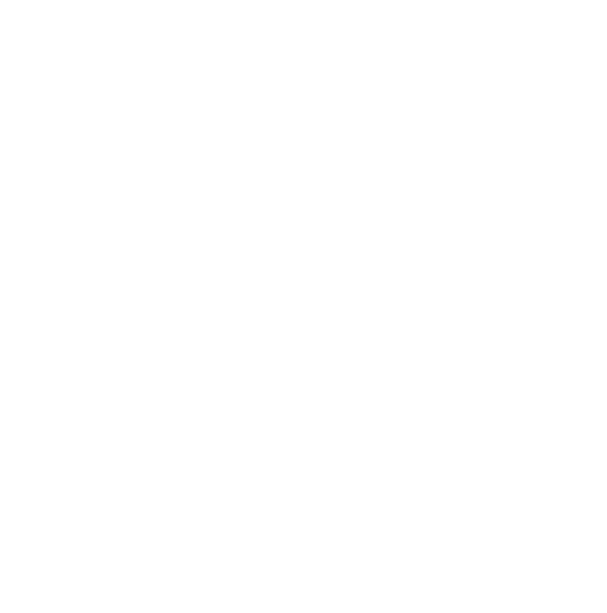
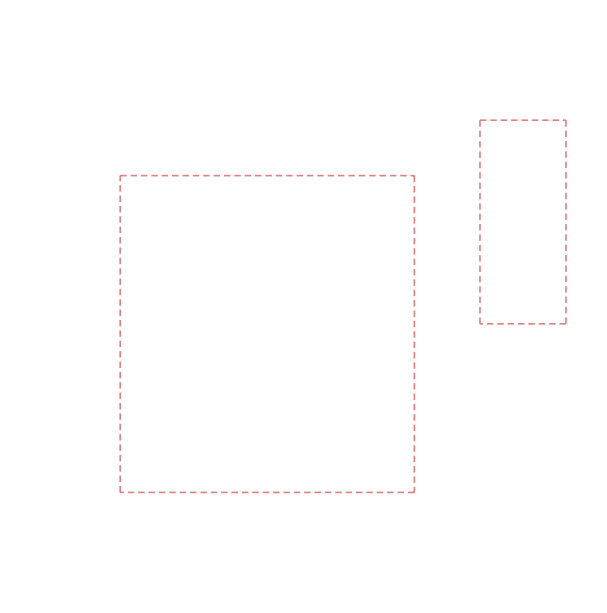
top zone outline: none -> (479, 120) (565, 120) (565, 323) (479, 323) (479, 120)
top zone outline: none -> (120, 175) (414, 175) (414, 492) (120, 492) (120, 175)

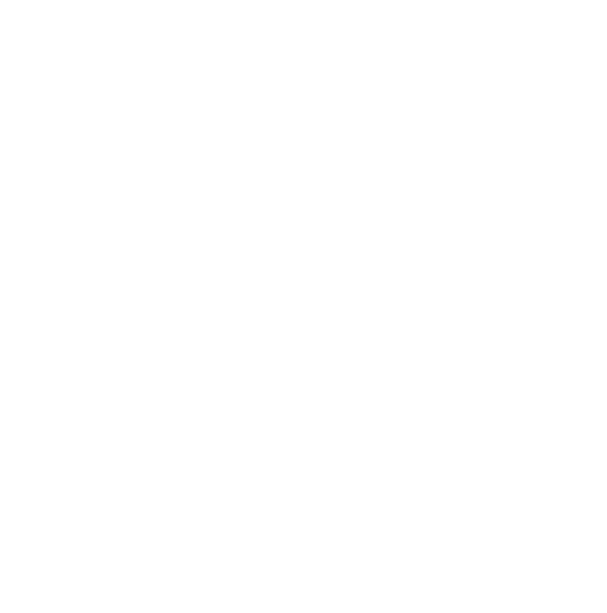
top zone outline: (479, 120) (565, 120) (565, 323) (479, 323) (479, 120) -> none
top zone outline: (120, 175) (414, 175) (414, 492) (120, 492) (120, 175) -> none

